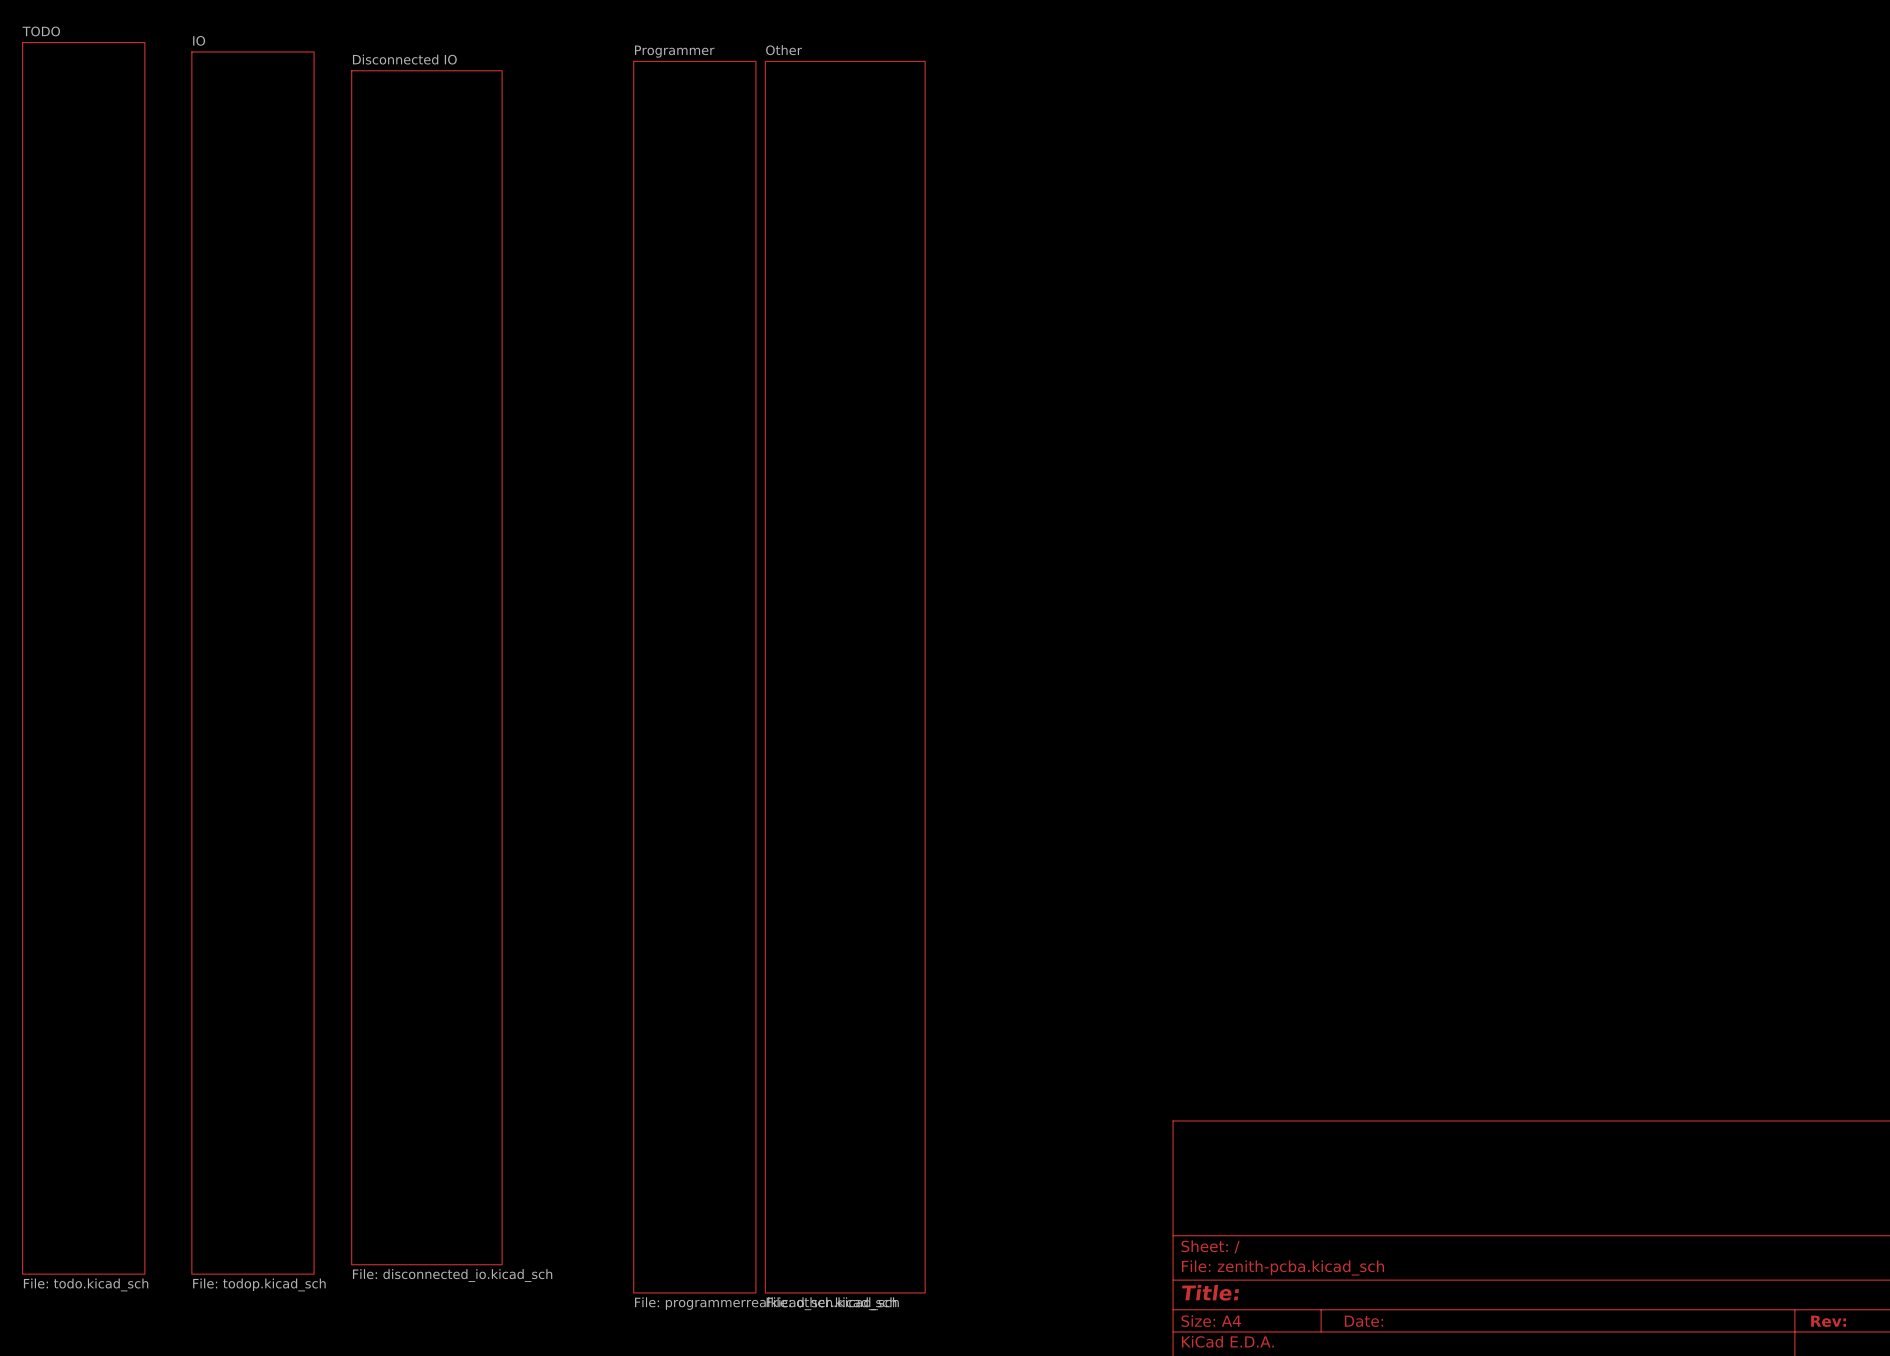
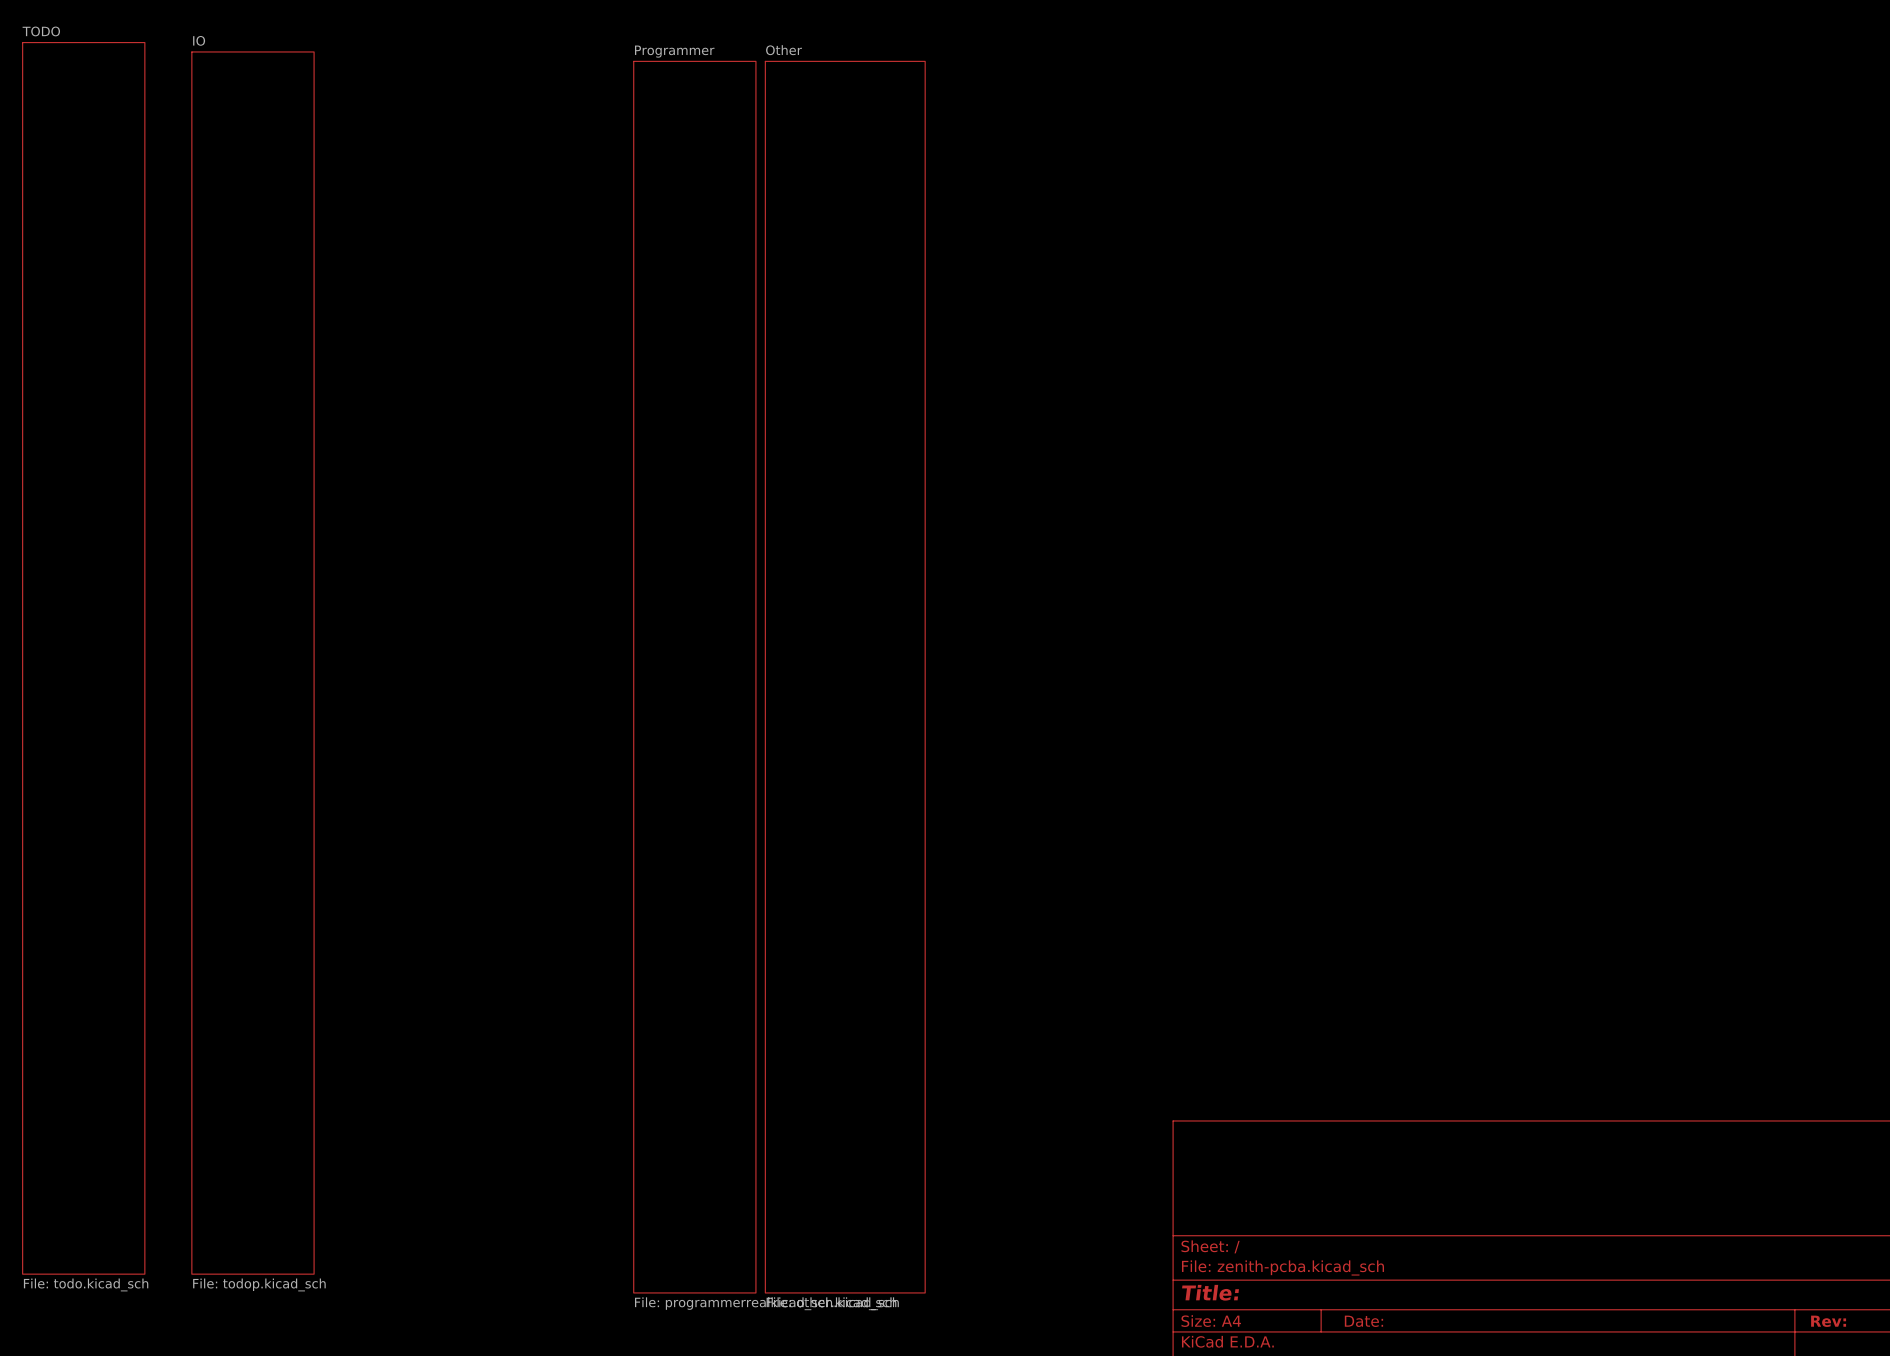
sheet Disconnected IO: File: disconnected_io.kicad_sch (426, 667) -> none

